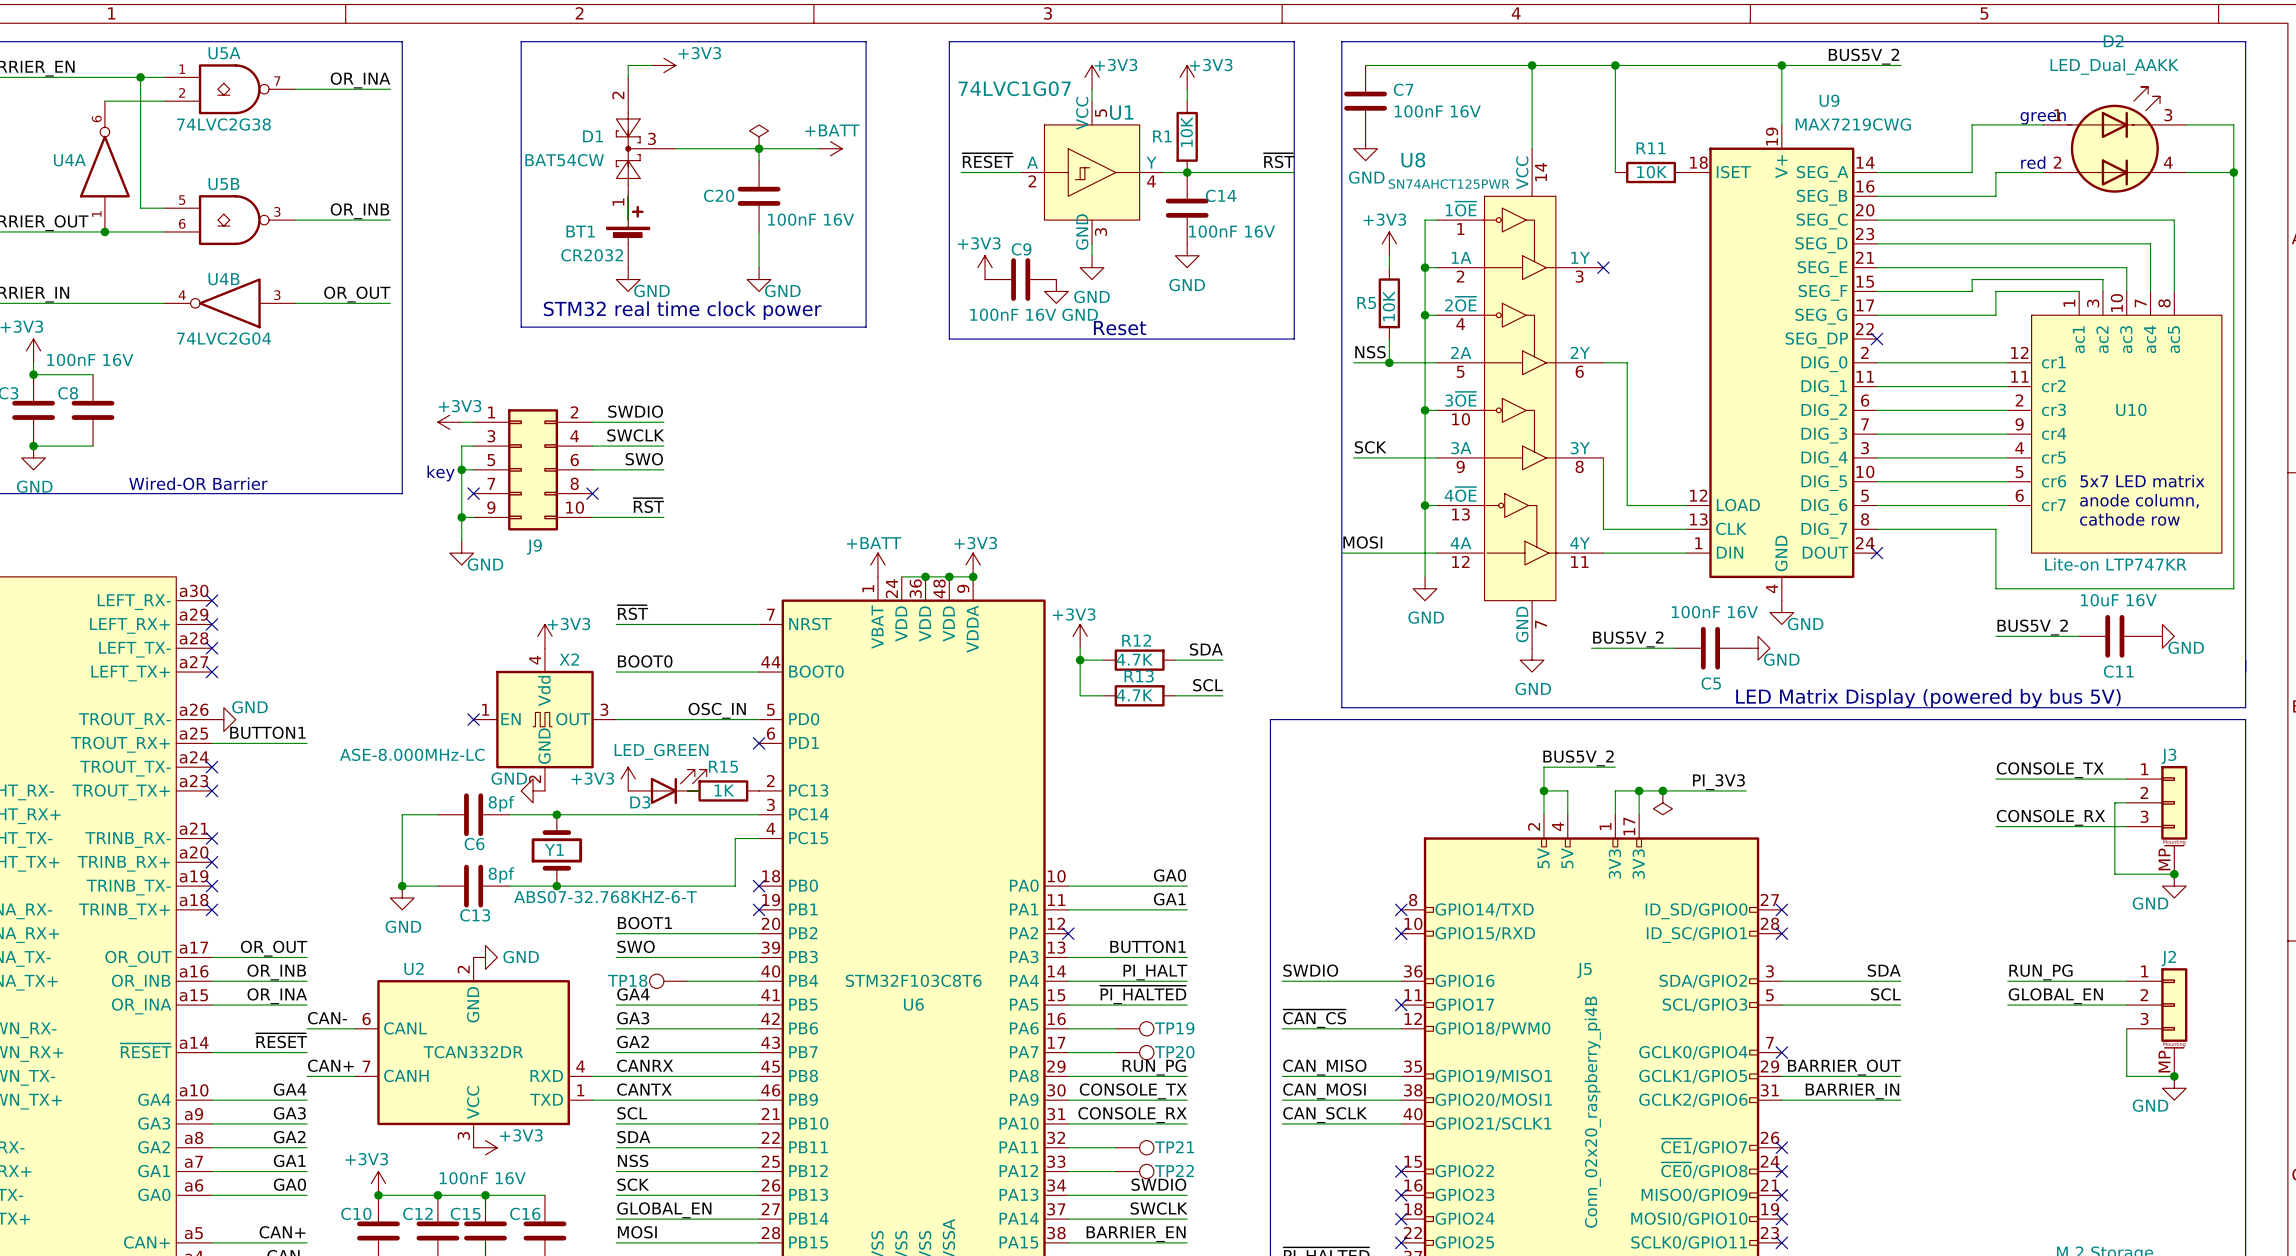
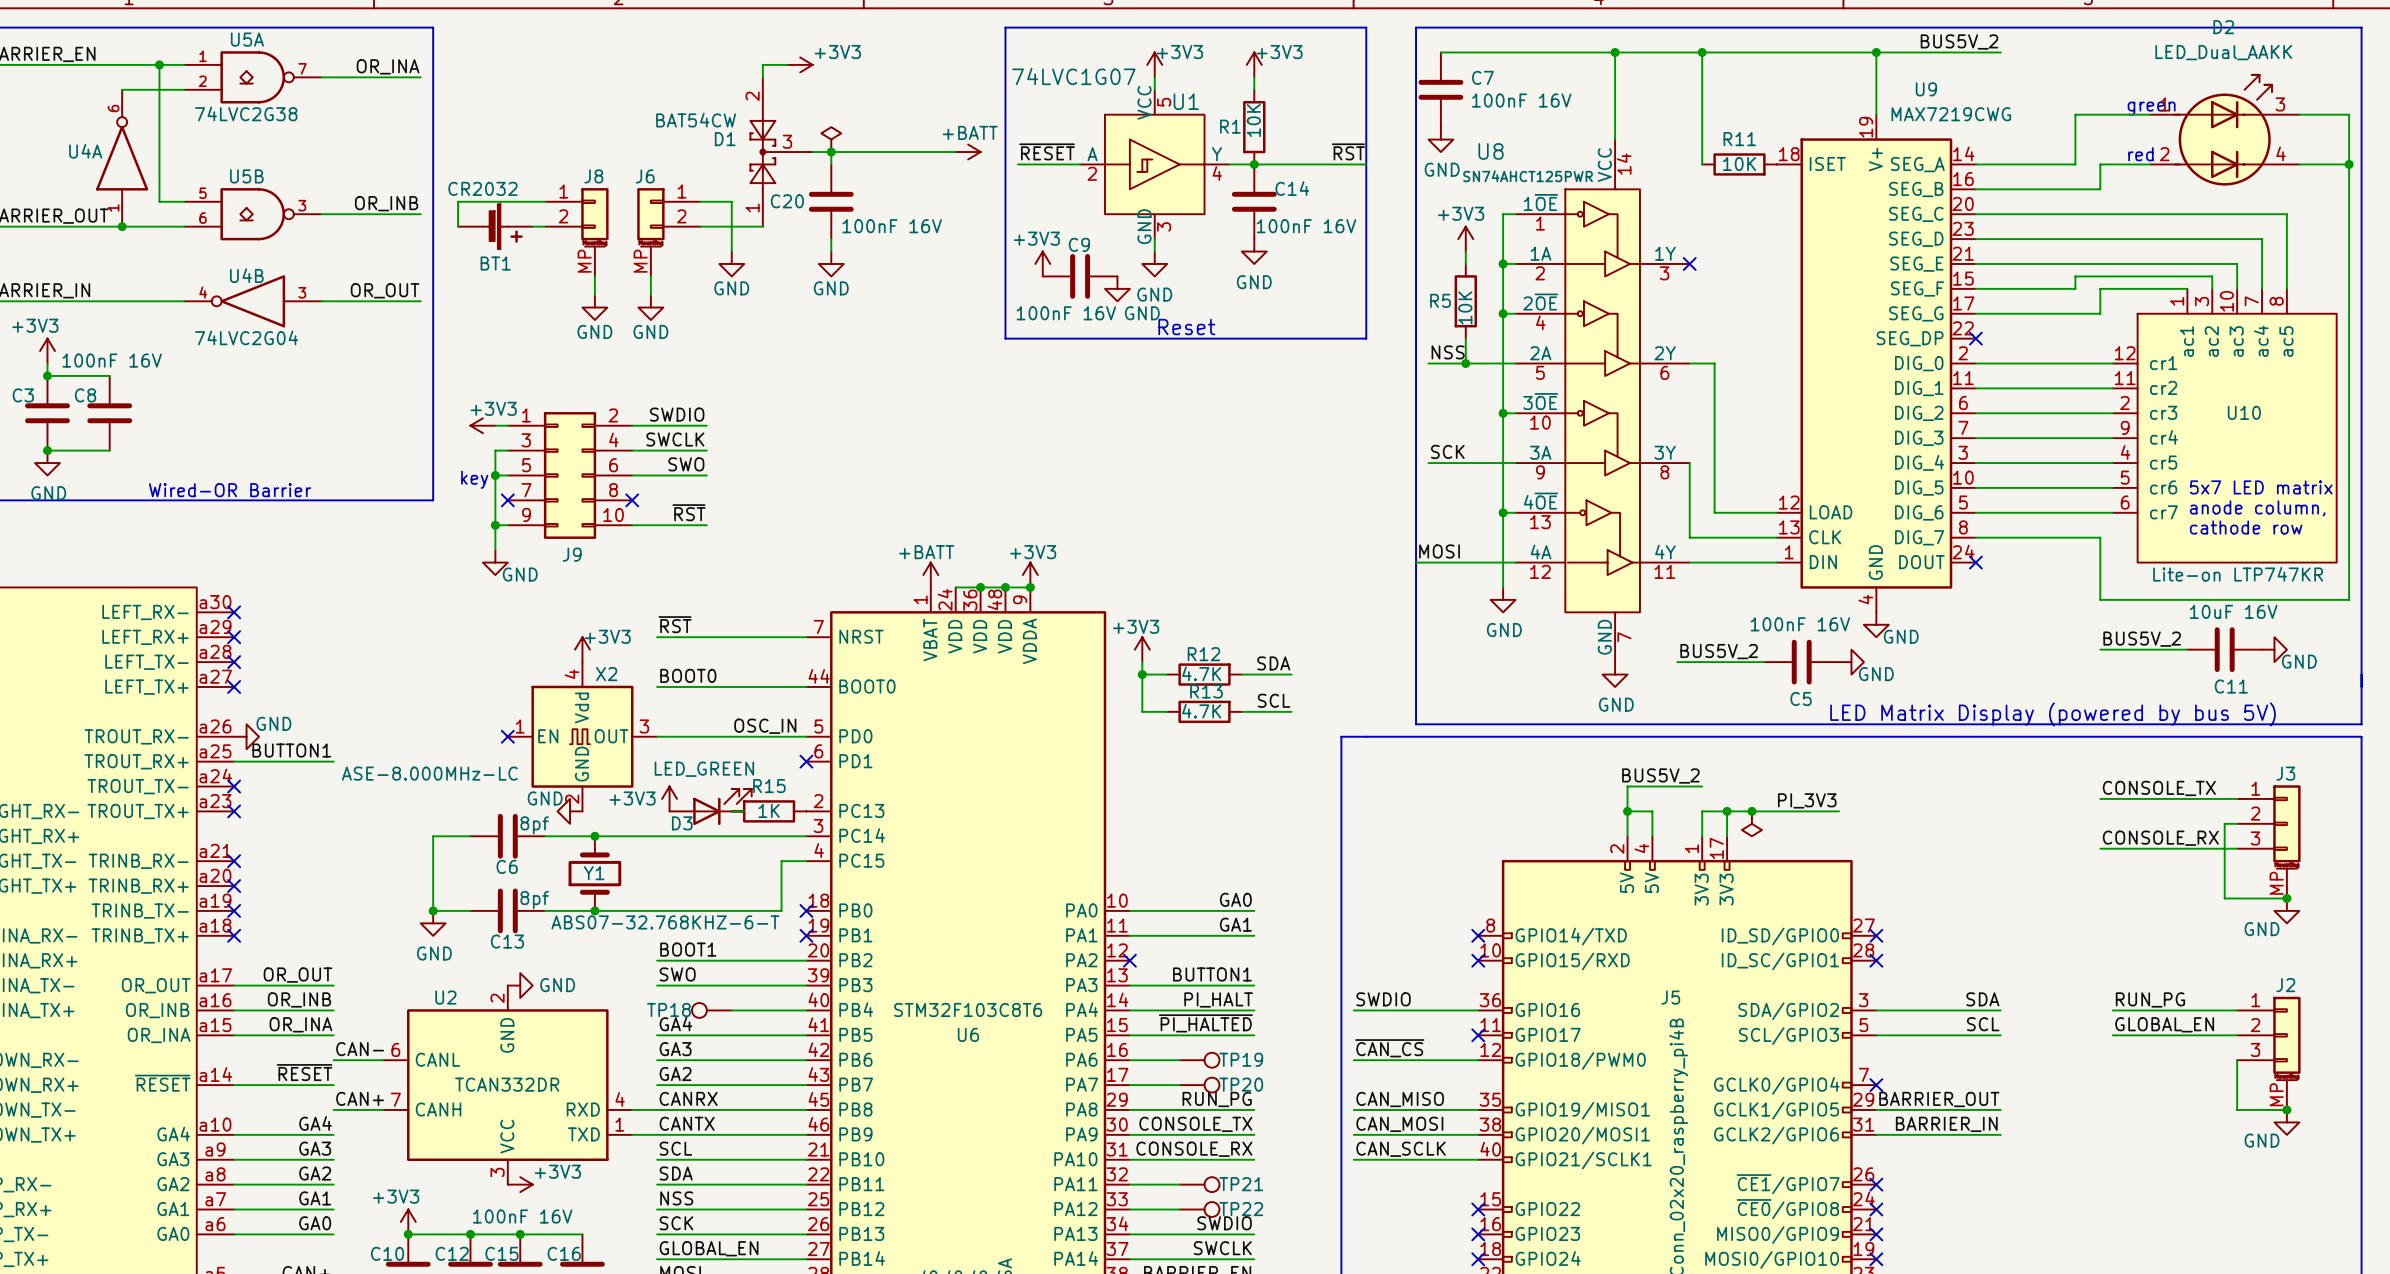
line: (521, 41) (521, 327) (866, 327) (866, 41) (521, 41) -> none
wire: (652, 65) (628, 65) (628, 77) -> (787, 64) (762, 64) (762, 77)
power symbol position: +3V3 (663, 65) -> +3V3 (800, 64)
power symbol position: (759, 136) -> (831, 139)
D1 position: (646, 148) -> (781, 152)
wire: (675, 148) (818, 148) -> none
wire: (759, 148) (759, 160) -> (831, 152) (831, 164)
junction position: (759, 148) -> (831, 152)
power symbol position: +BATT (830, 148) -> +BATT (968, 152)
D1 value position: BAT54CW (564, 160) -> BAT54CW (696, 120)
wire: none -> (812, 152) (955, 152)
wire: (628, 196) (628, 220) -> none
C20 position: (759, 196) -> (831, 201)
wire: none -> (545, 201) (458, 201) (458, 226)
wire: none -> (700, 201) (731, 201) (731, 251)
C20 value position: 100nF 16V (811, 219) -> 100nF 16V (892, 226)
BT1 rotation: 0° (628, 224) -> 90° clockwise (502, 226)
wire: none -> (532, 226) (545, 226)
BT1 name position: BT1 (580, 231) -> BT1 (495, 263)
BT1 position: (628, 231) -> (495, 226)
wire: none -> (700, 226) (762, 226)
wire: (759, 231) (759, 267) -> none
J8: none -> (576, 232)
J6: none -> (668, 232)
wire: none -> (831, 239) (831, 251)
power symbol: none -> GND (731, 263)
wire: none -> (594, 276) (594, 295)
wire: none -> (650, 276) (650, 295)
power symbol: GND (628, 279) -> none
power symbol position: GND (759, 279) -> GND (831, 263)
power symbol: none -> GND (594, 307)
power symbol: none -> GND (650, 307)
text: STM32 real time clock power (682, 310) -> none

